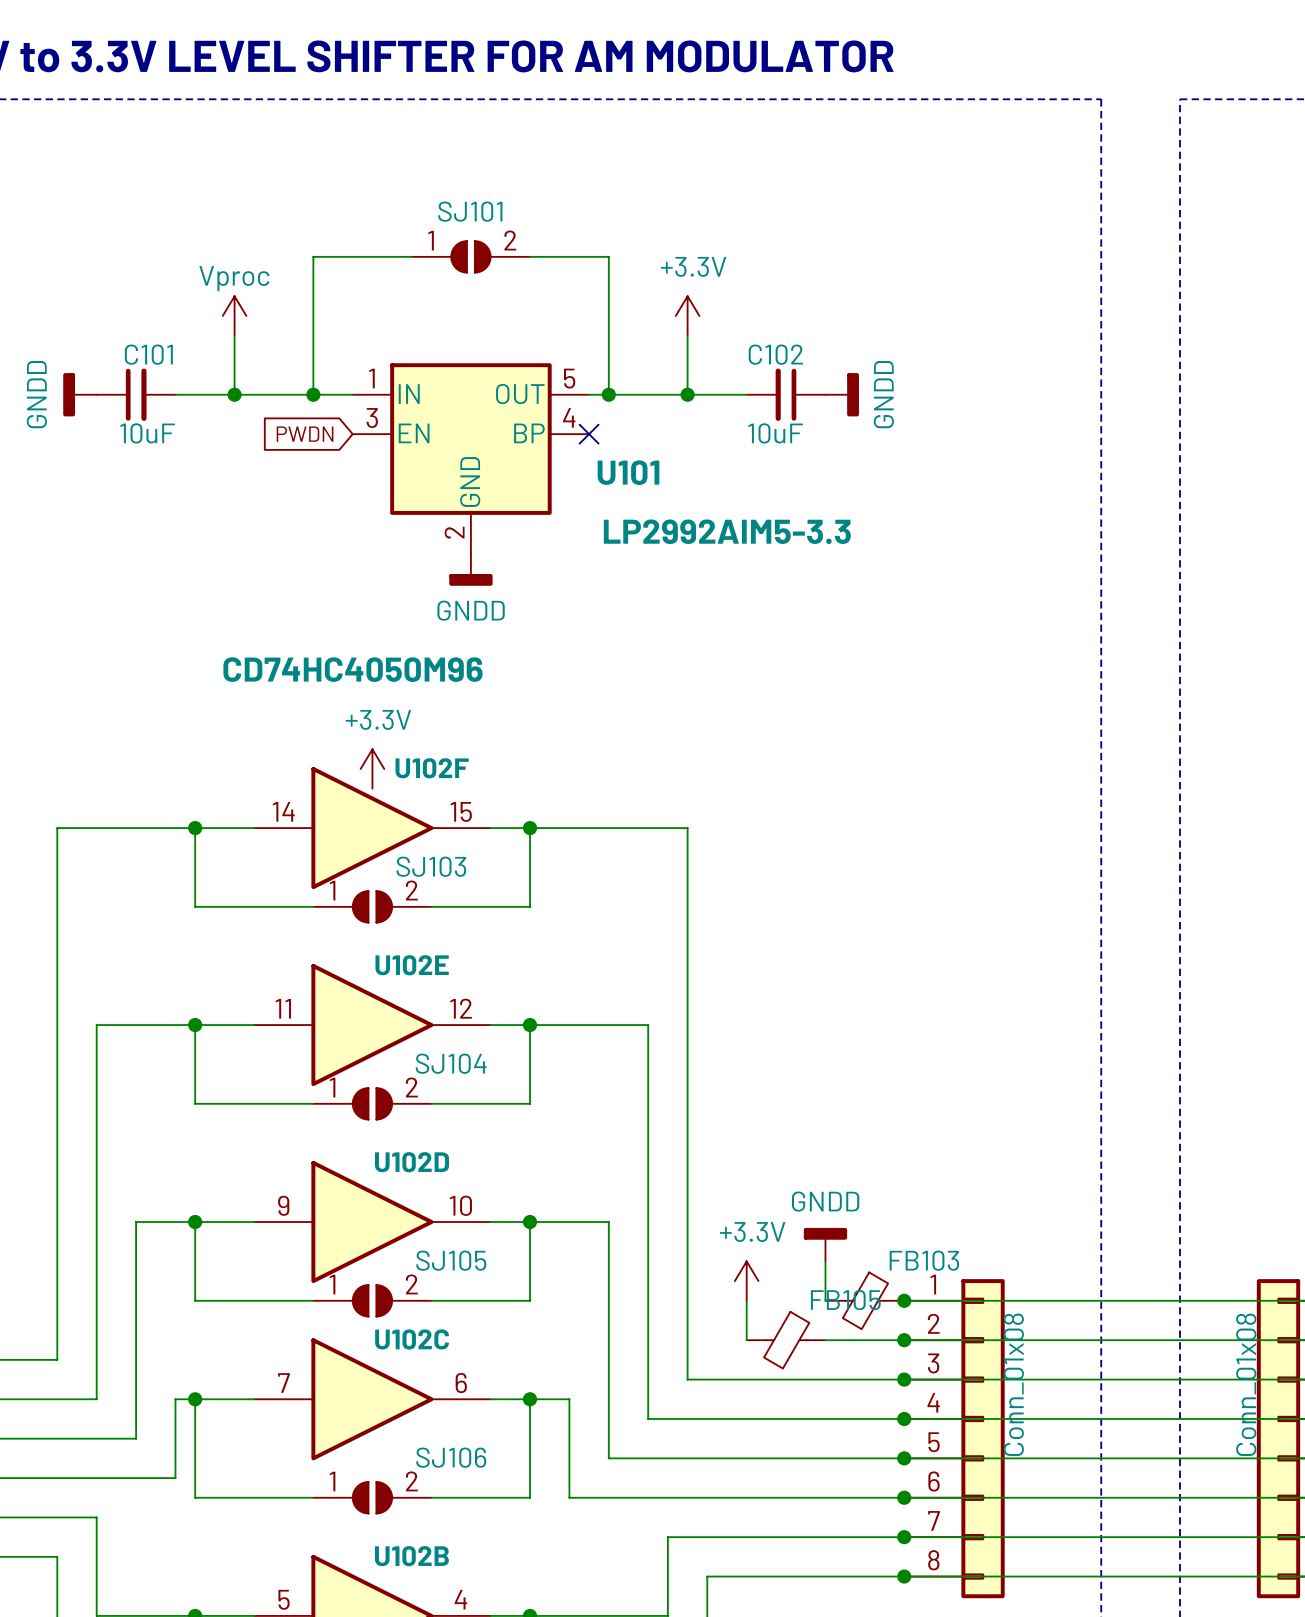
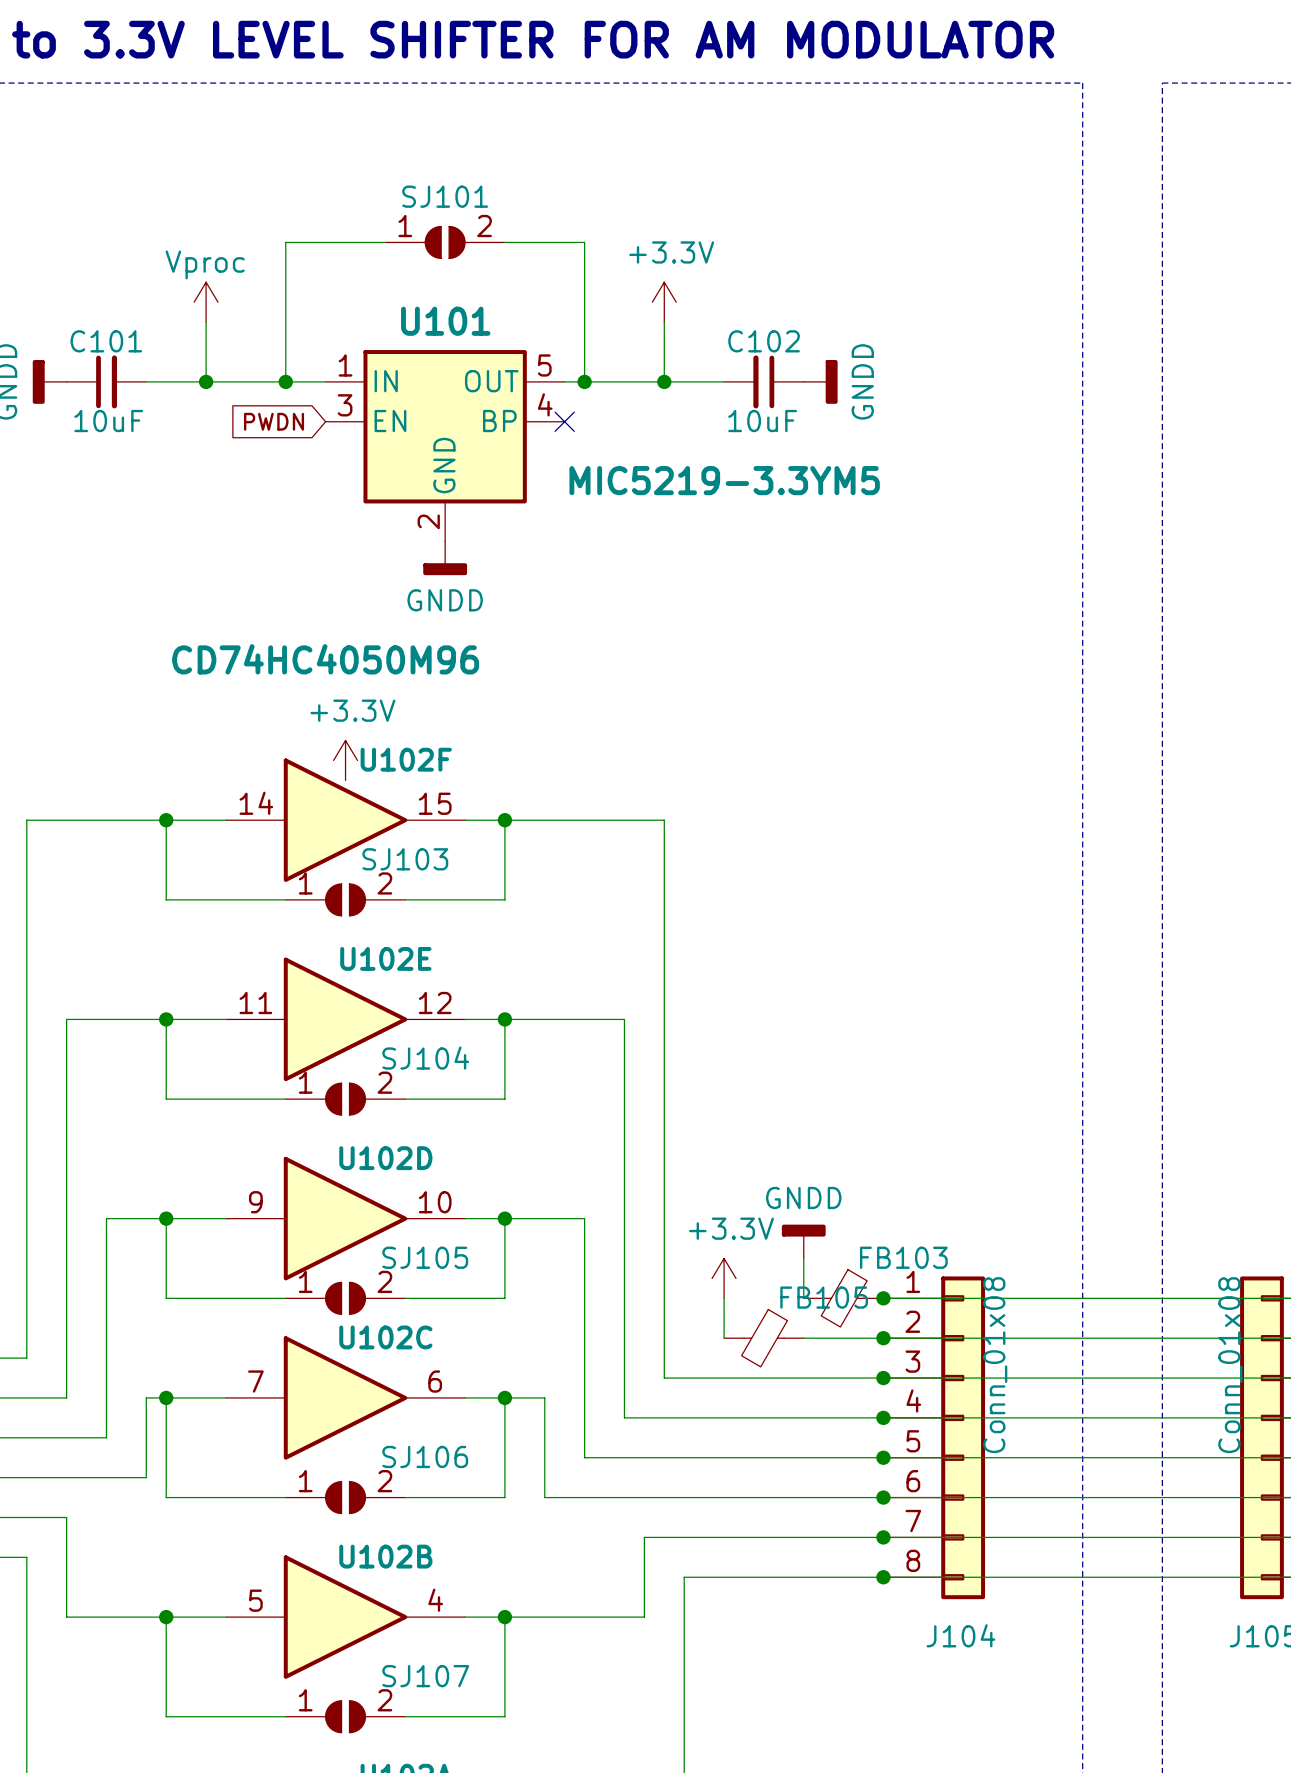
U101 name position: U101 (628, 472) -> U101 (445, 321)
U101 value: LP2992AIM5-3.3 (727, 531) -> MIC5219-3.3YM5 (724, 480)

